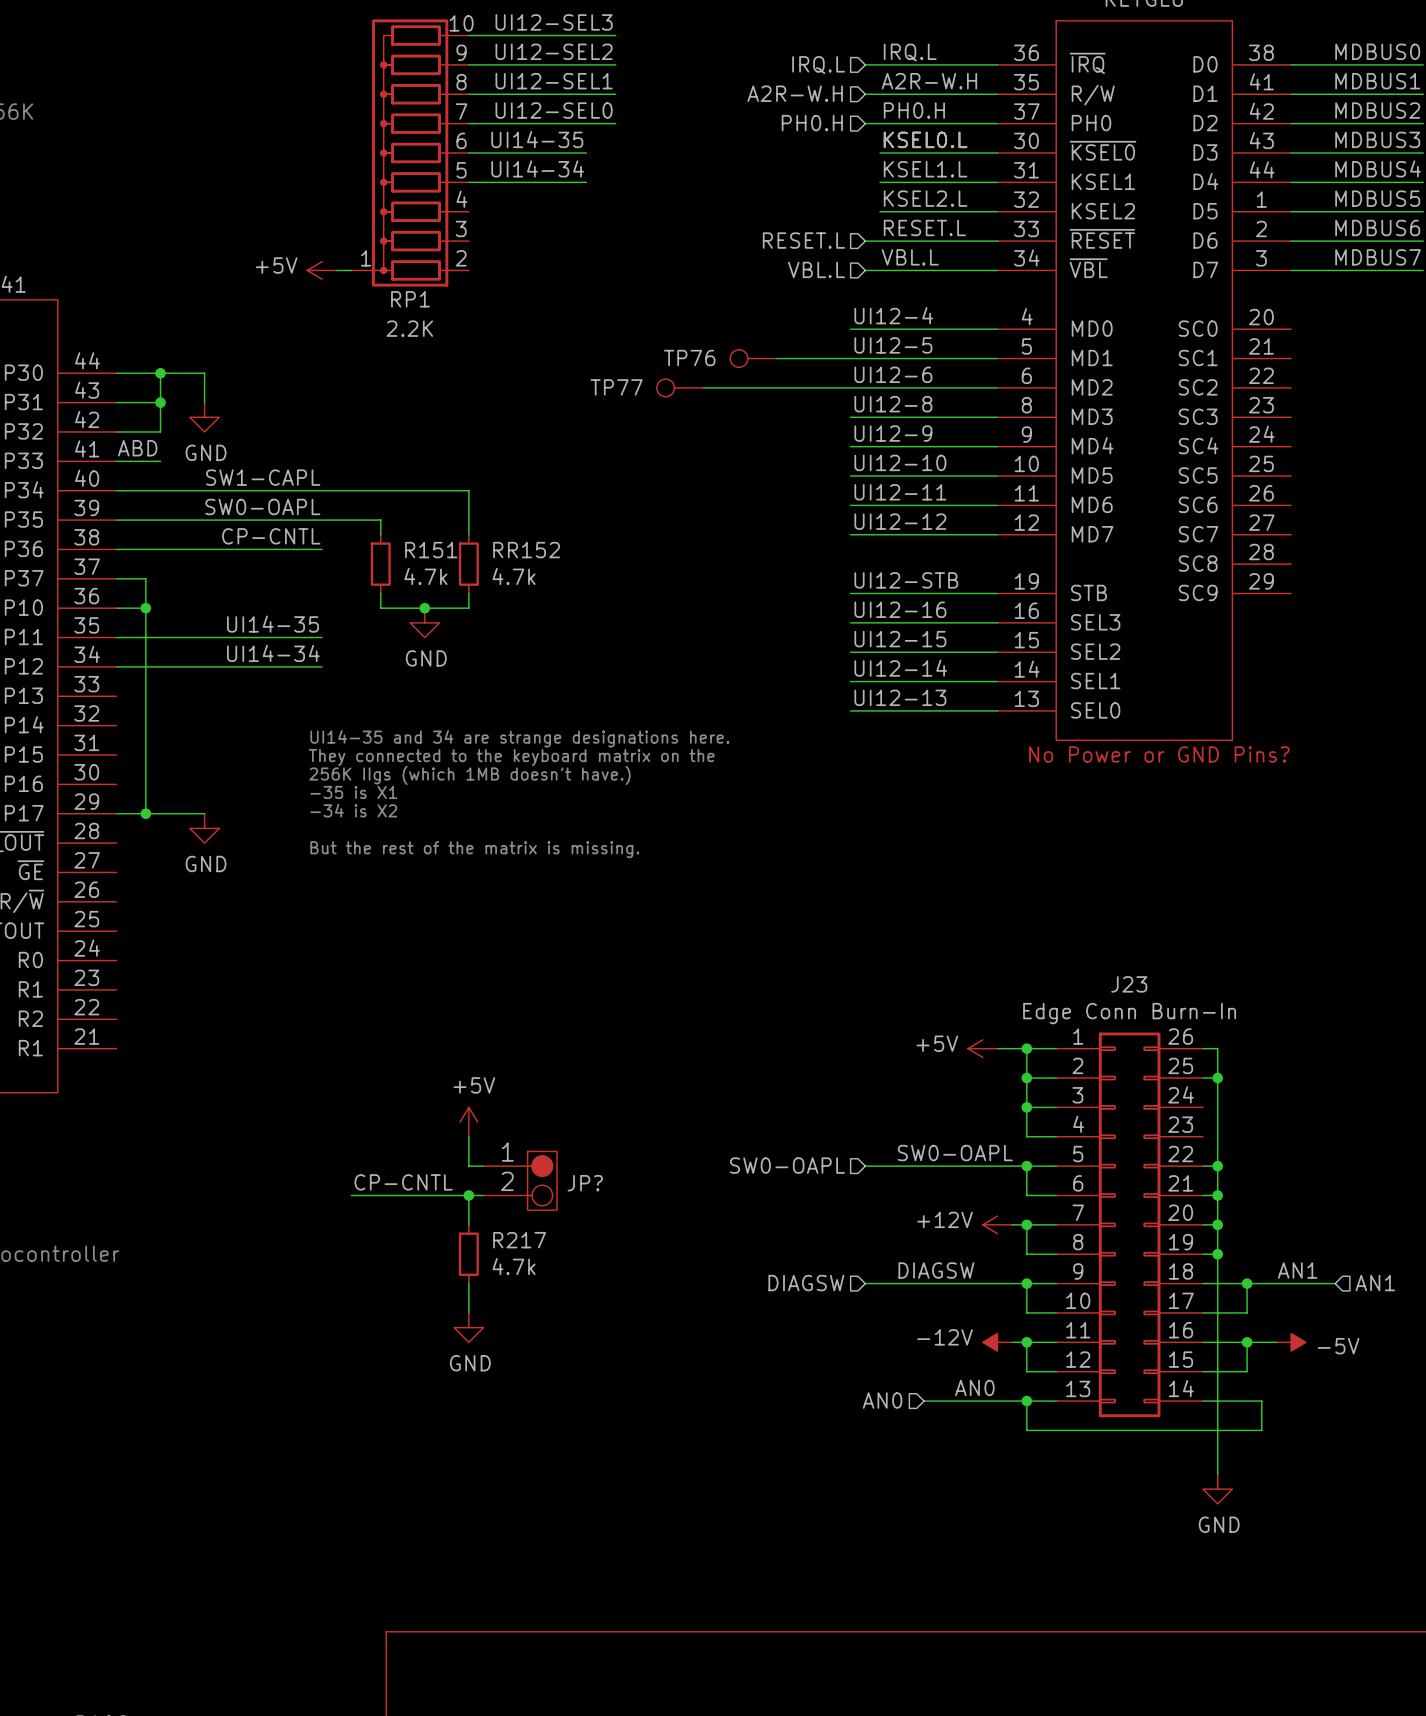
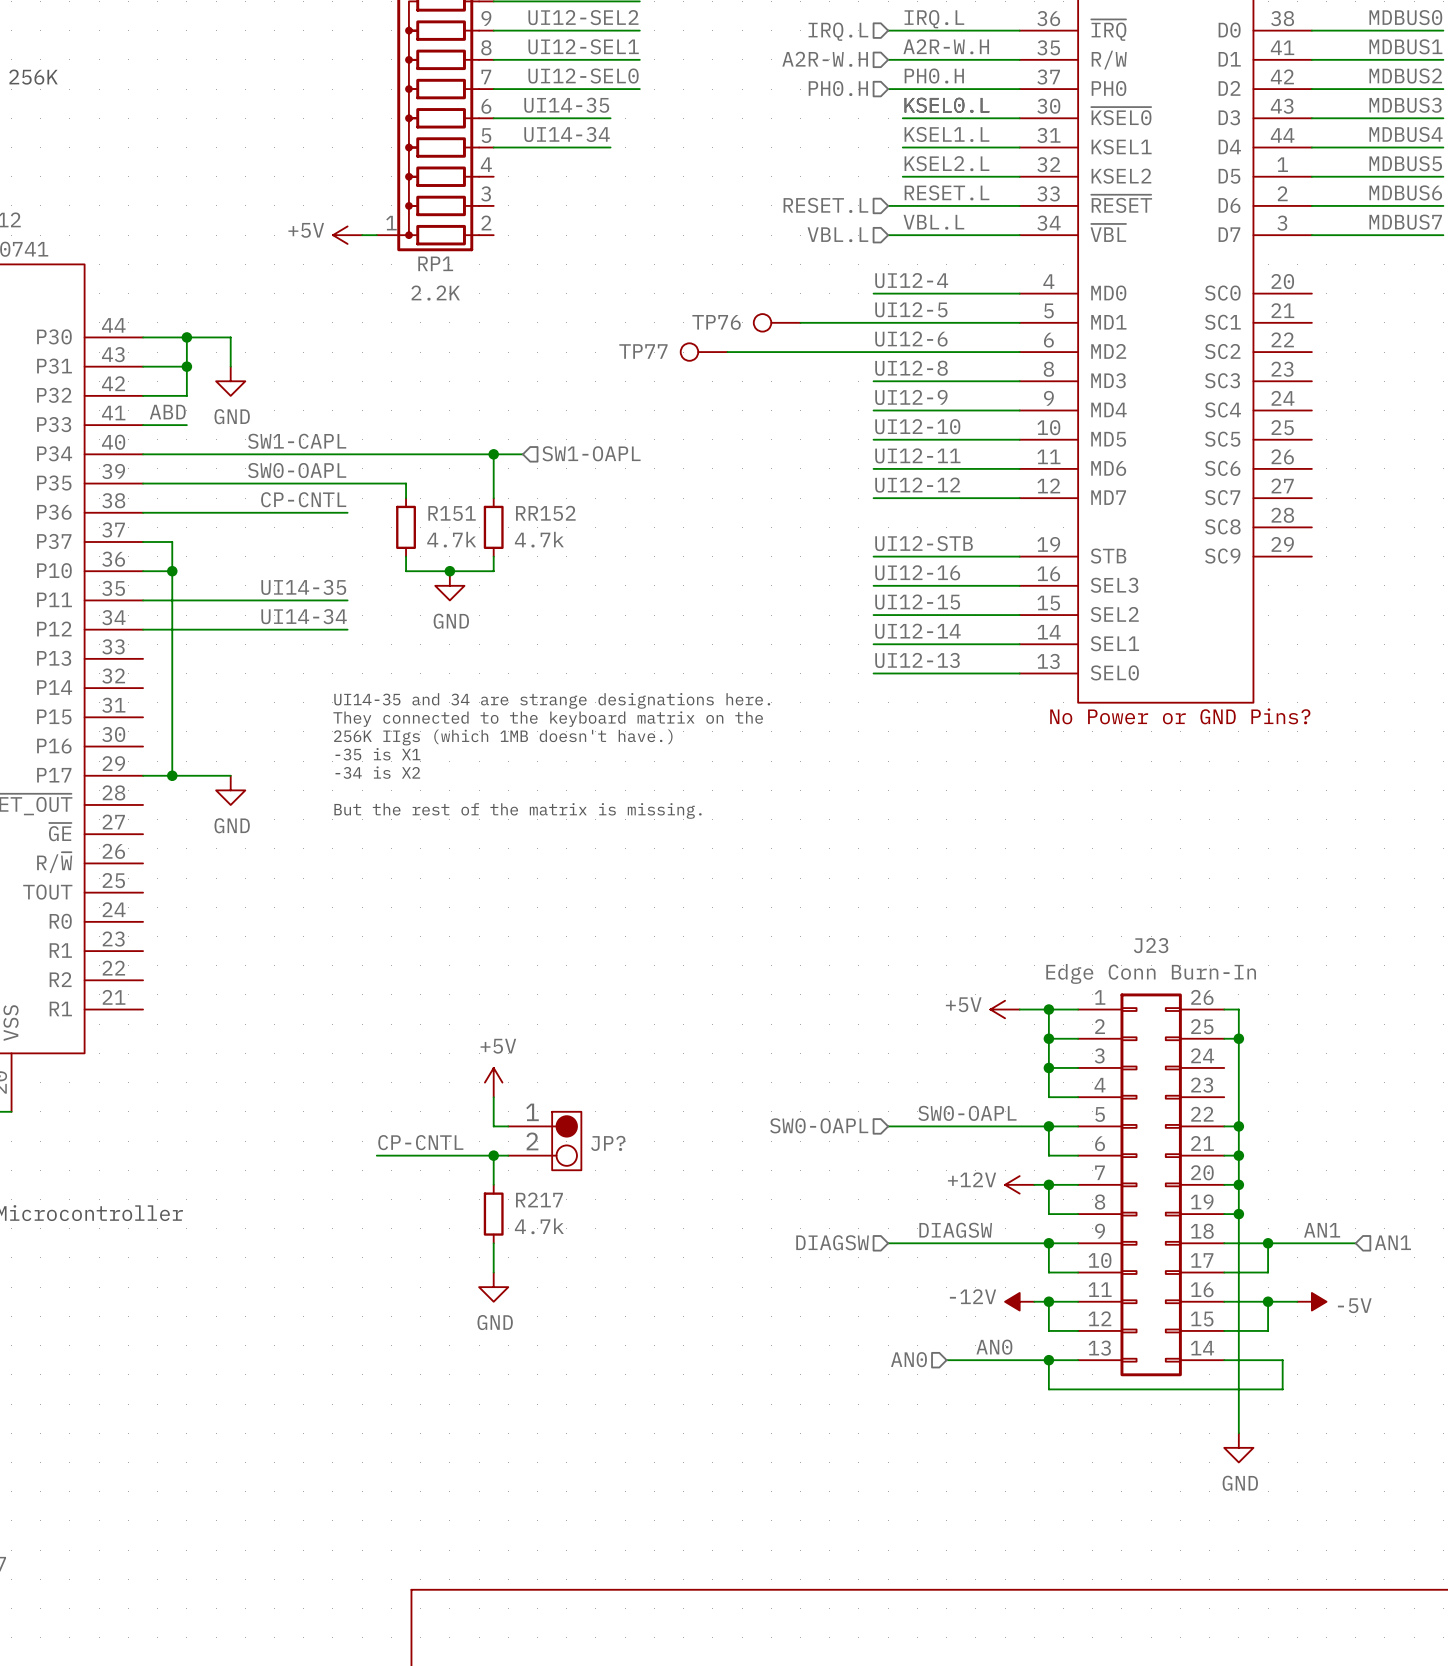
wire: none -> (493, 454) (522, 454)
junction: none -> (493, 454)
hierarchical label: none -> SW1-OAPL (591, 453)

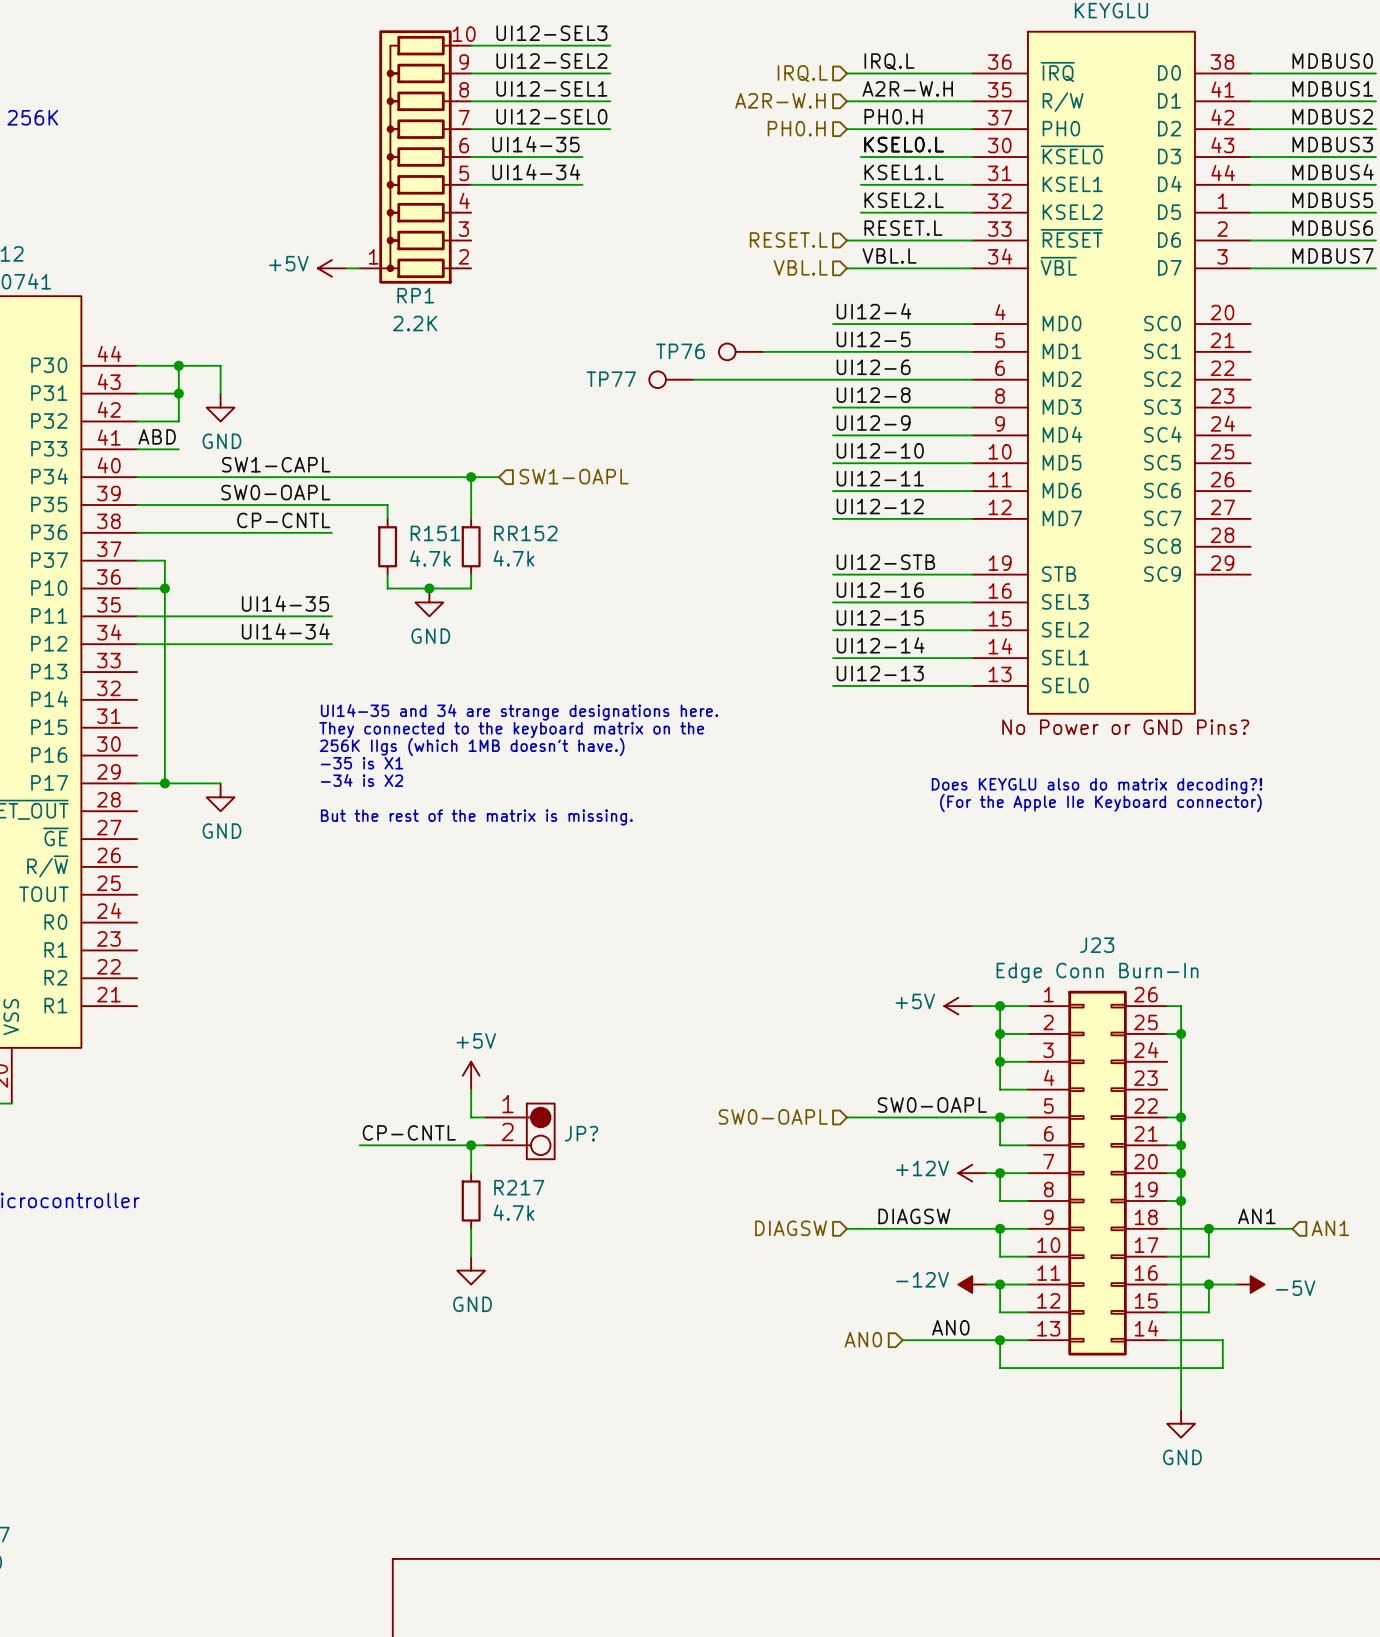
text: none -> Does KEYGLU also do matrix decoding?! (1097, 786)
text: none -> (For the Apple IIe Keyboard connector) (1100, 803)

